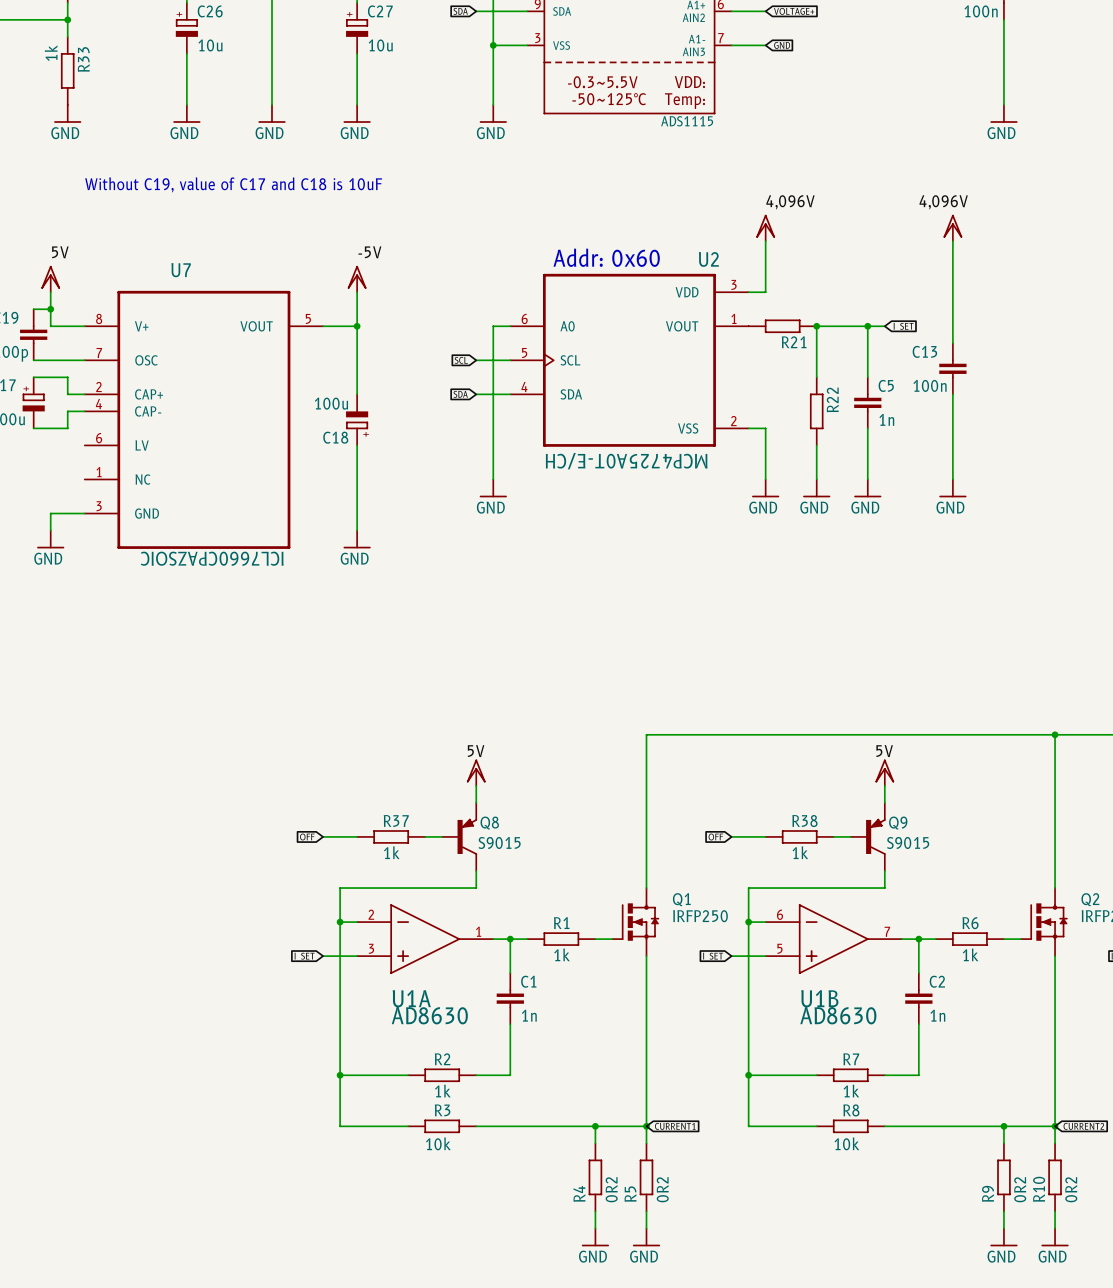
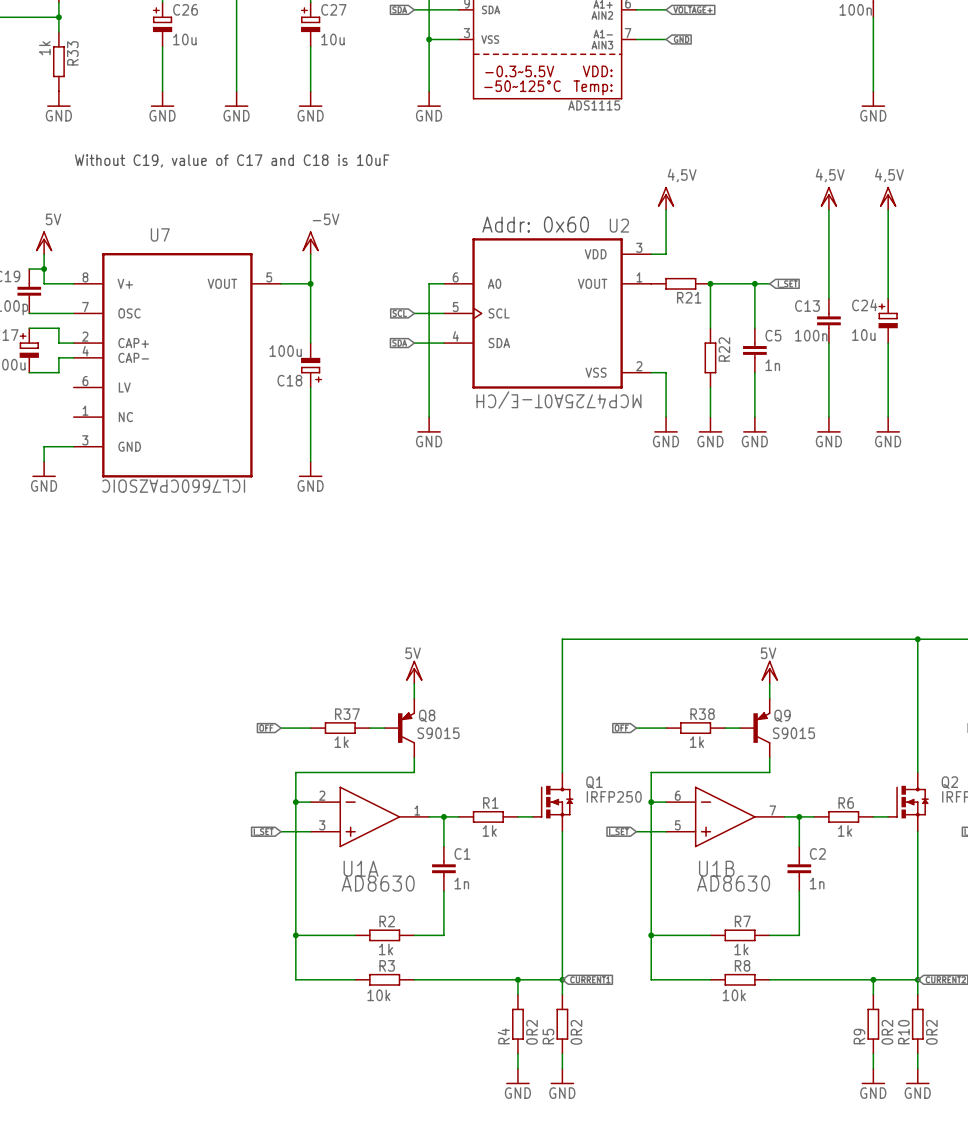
label: 4,096V (790, 202) -> 4,5V (682, 175)
label: 4,096V (943, 202) -> none
label: none -> 4,5V (830, 175)
label: none -> 4,5V (889, 175)
power symbol: none -> (888, 198)
wire: none -> (888, 209) (888, 298)
C24: none -> 10u (888, 320)
wire: none -> (888, 343) (888, 417)
power symbol: none -> GND (888, 424)

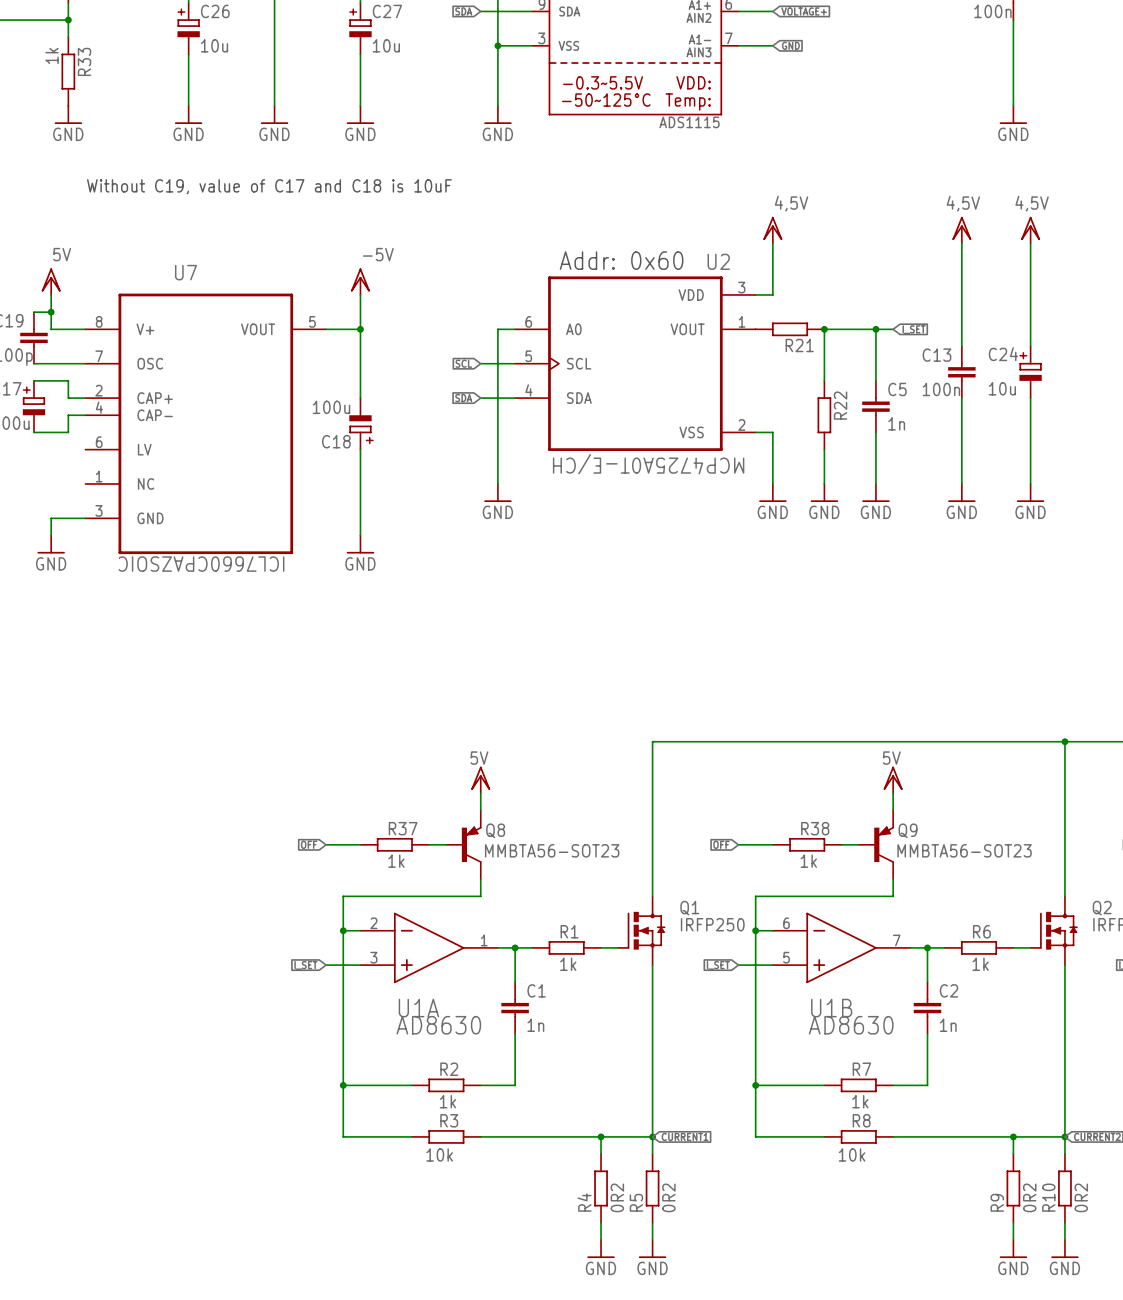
Q8 value: S9015 (438, 733) -> MMBTA56-SOT23 (552, 850)
Q9 value: S9015 (793, 733) -> MMBTA56-SOT23 (964, 850)

